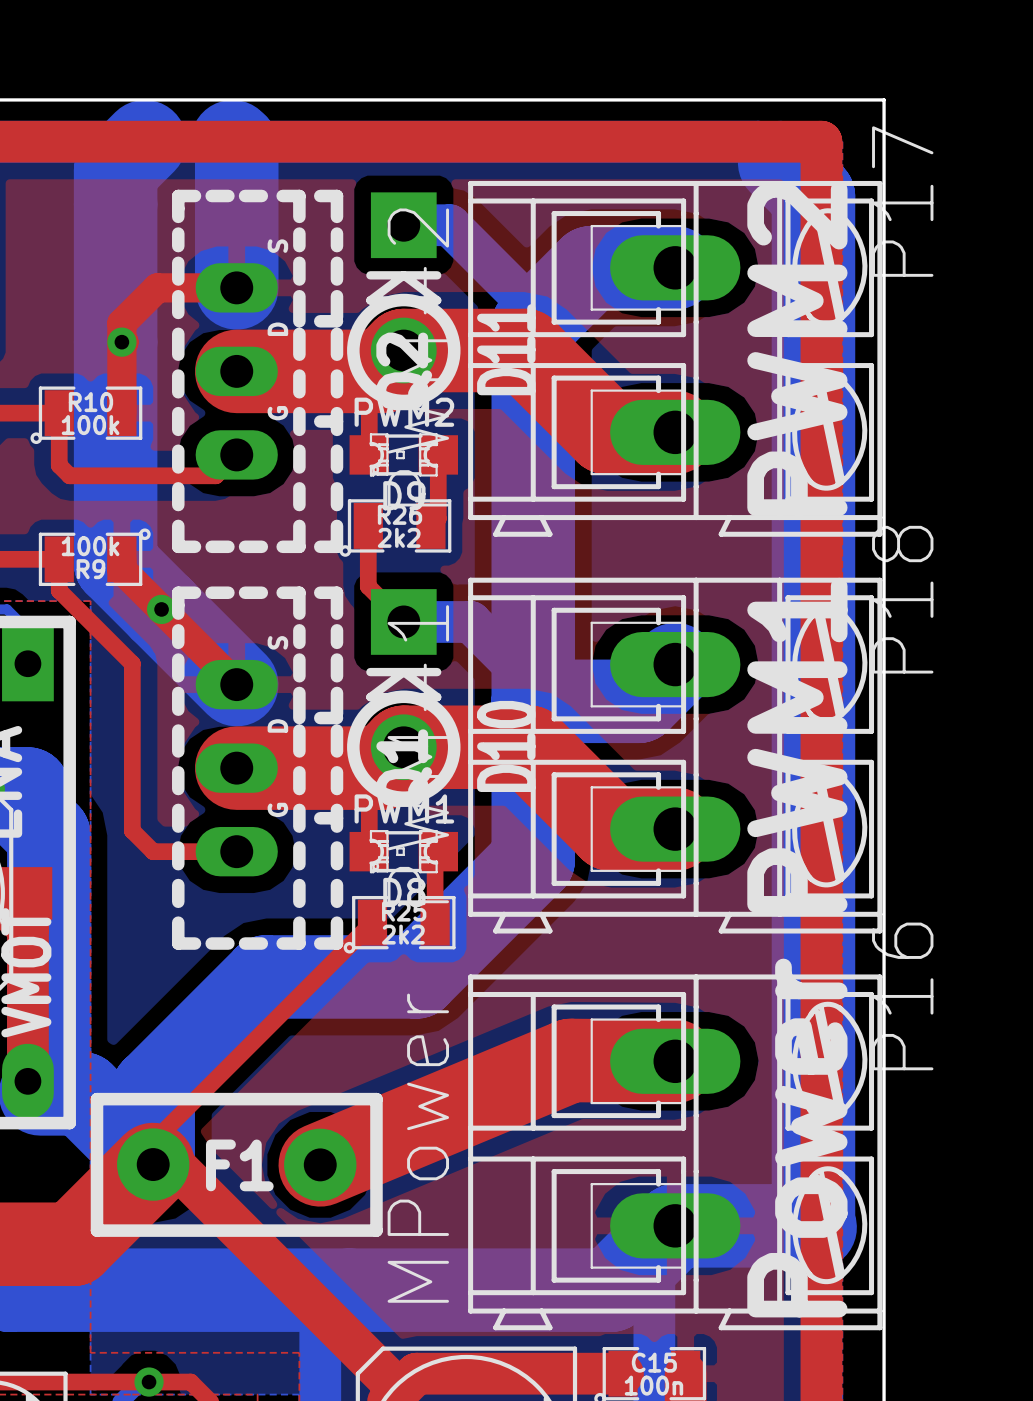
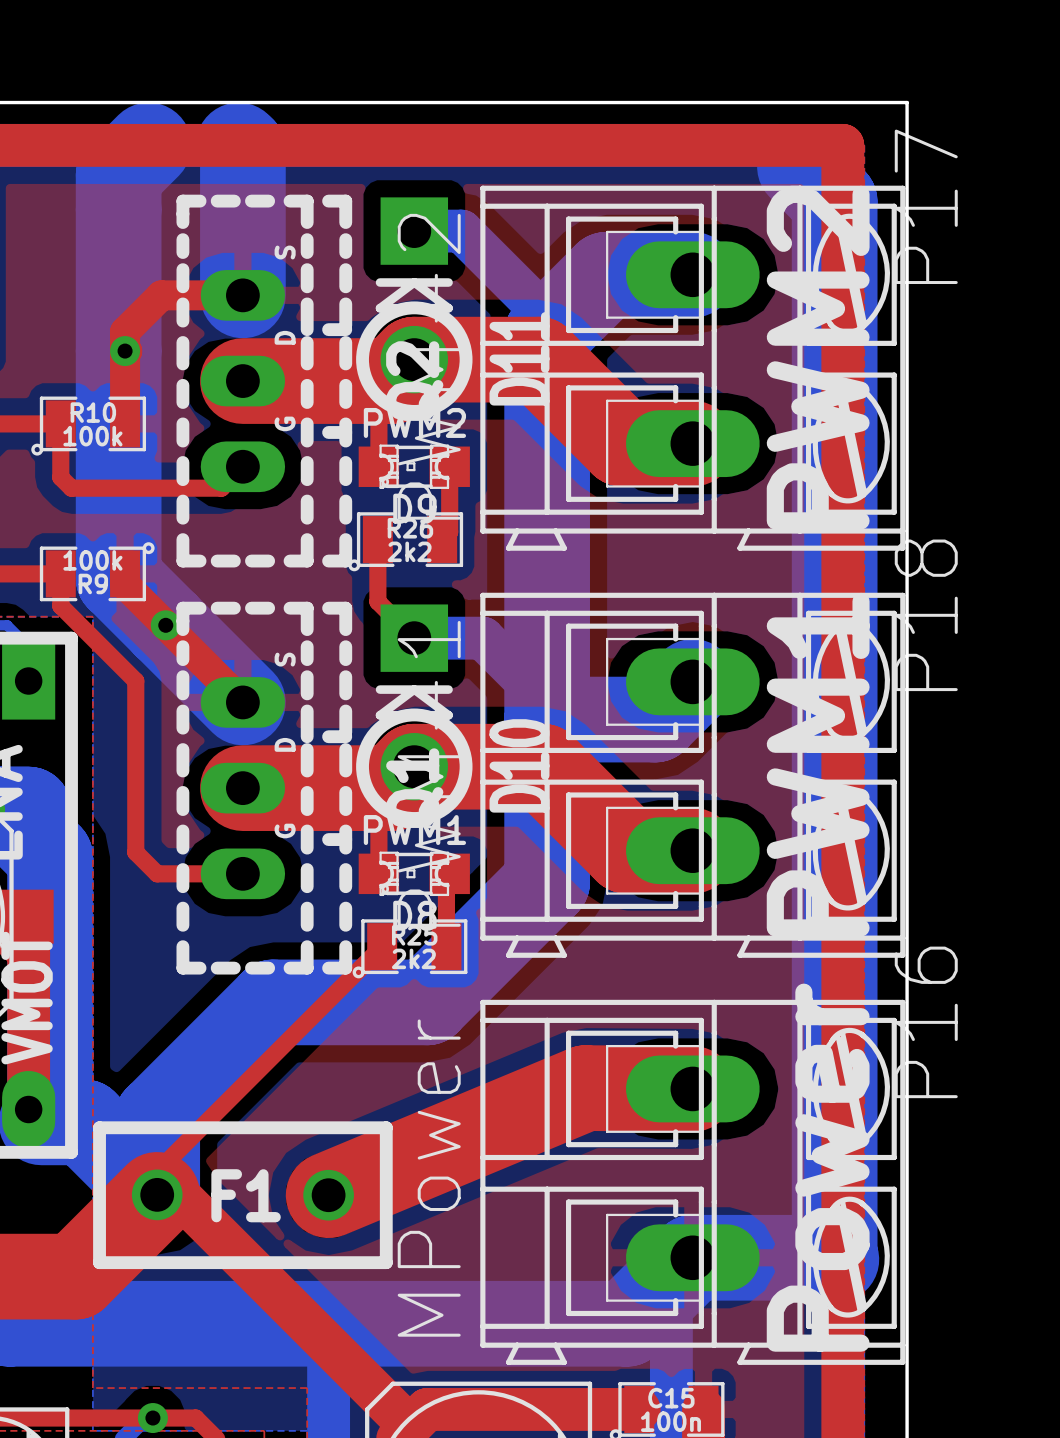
F1 footprint: [90, 1092, 383, 1237] -> [93, 1121, 393, 1270]

